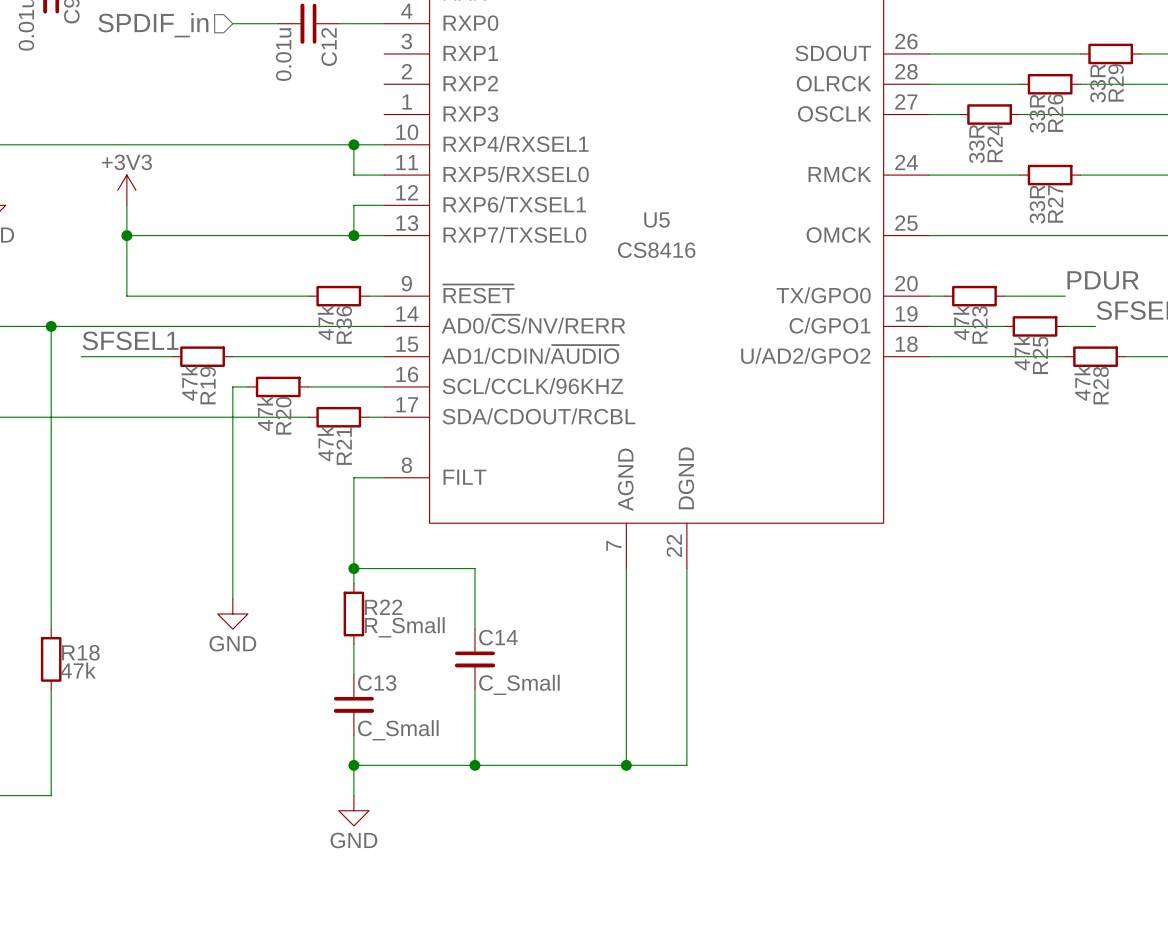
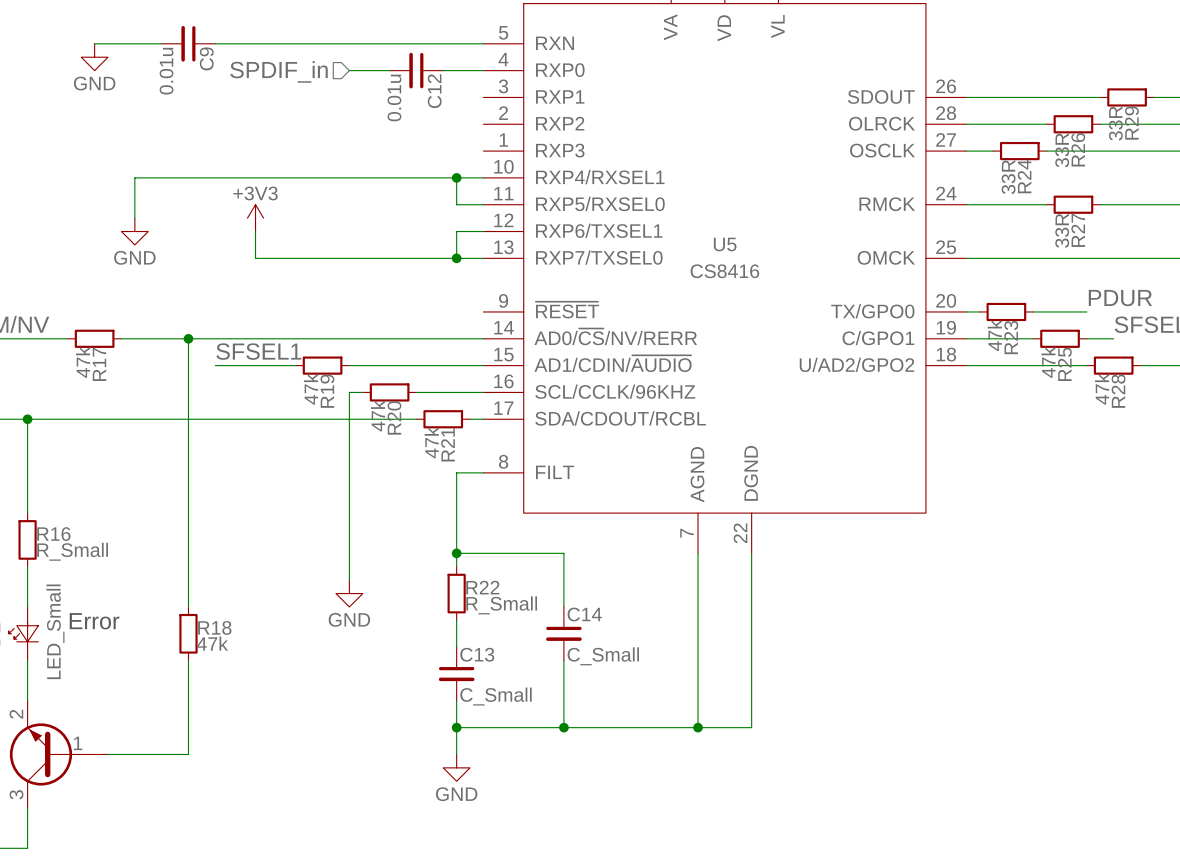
wire: (126, 235) (126, 296) (308, 296) -> none
junction: (126, 235) -> none
R36: 47k (338, 296) -> none
wire: (369, 296) (384, 296) -> none

